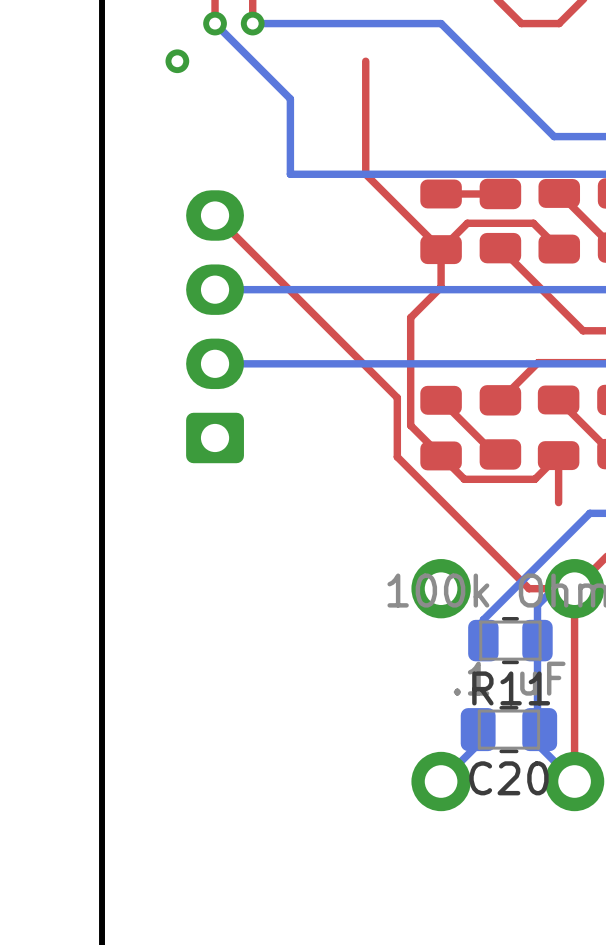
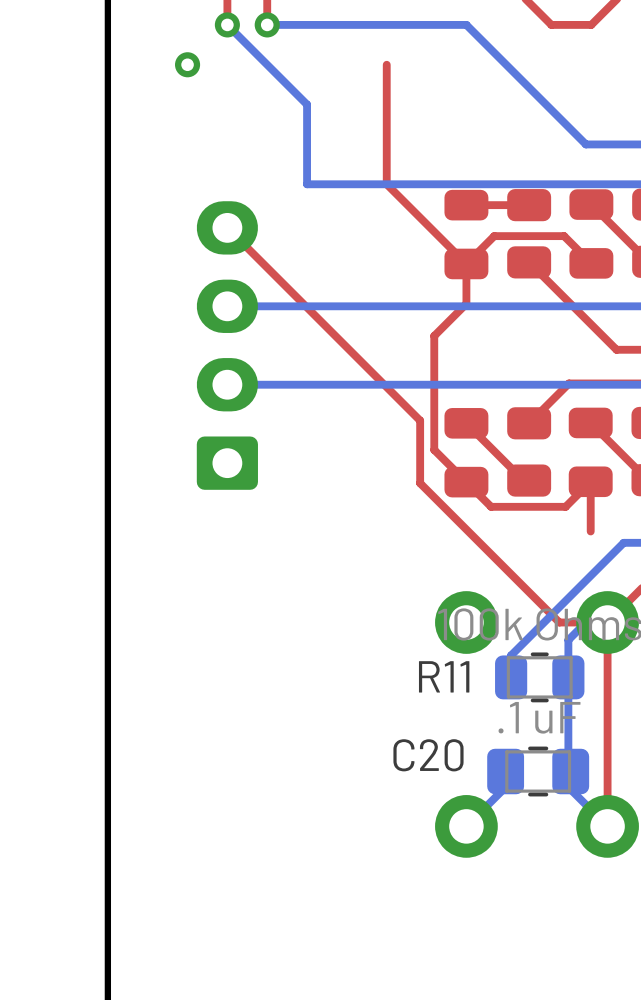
R11 name position: R11 (511, 688) -> R11 (444, 676)
C20 name position: C20 (508, 778) -> C20 (428, 755)

